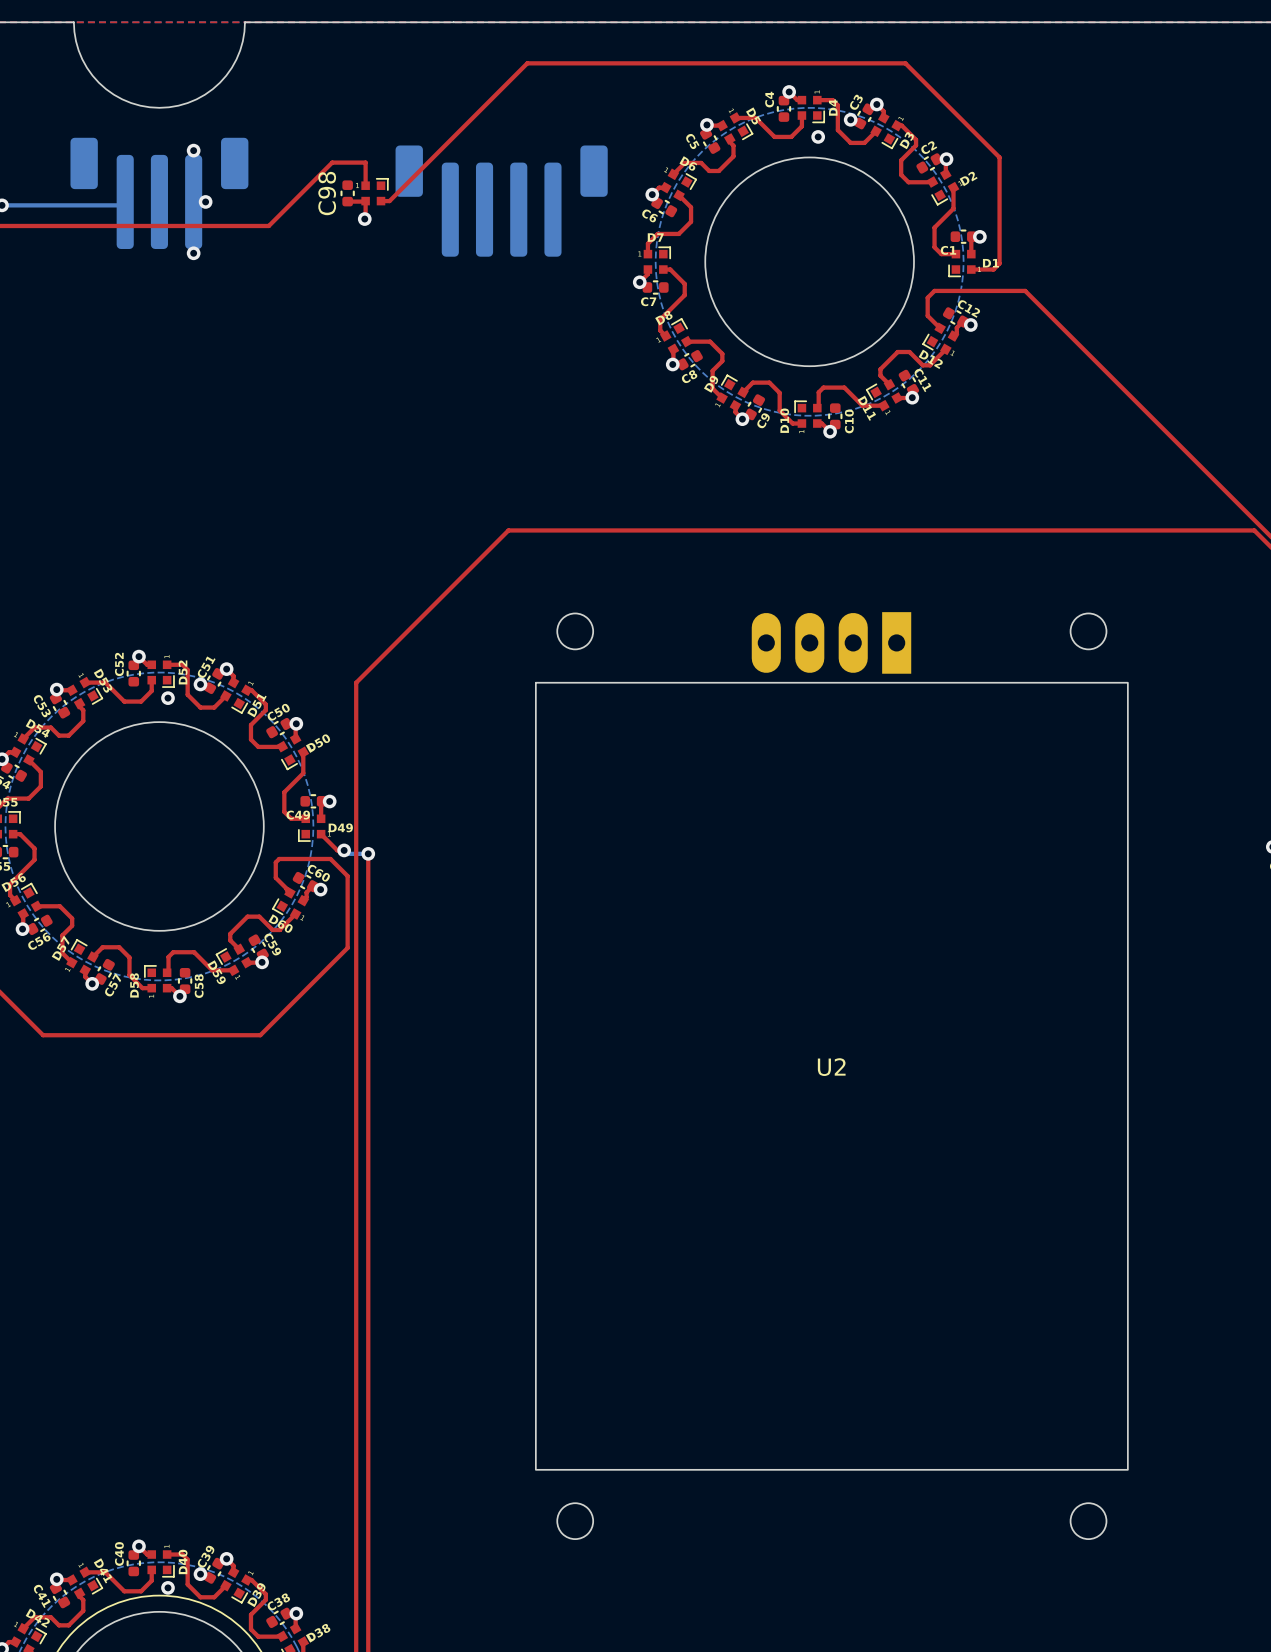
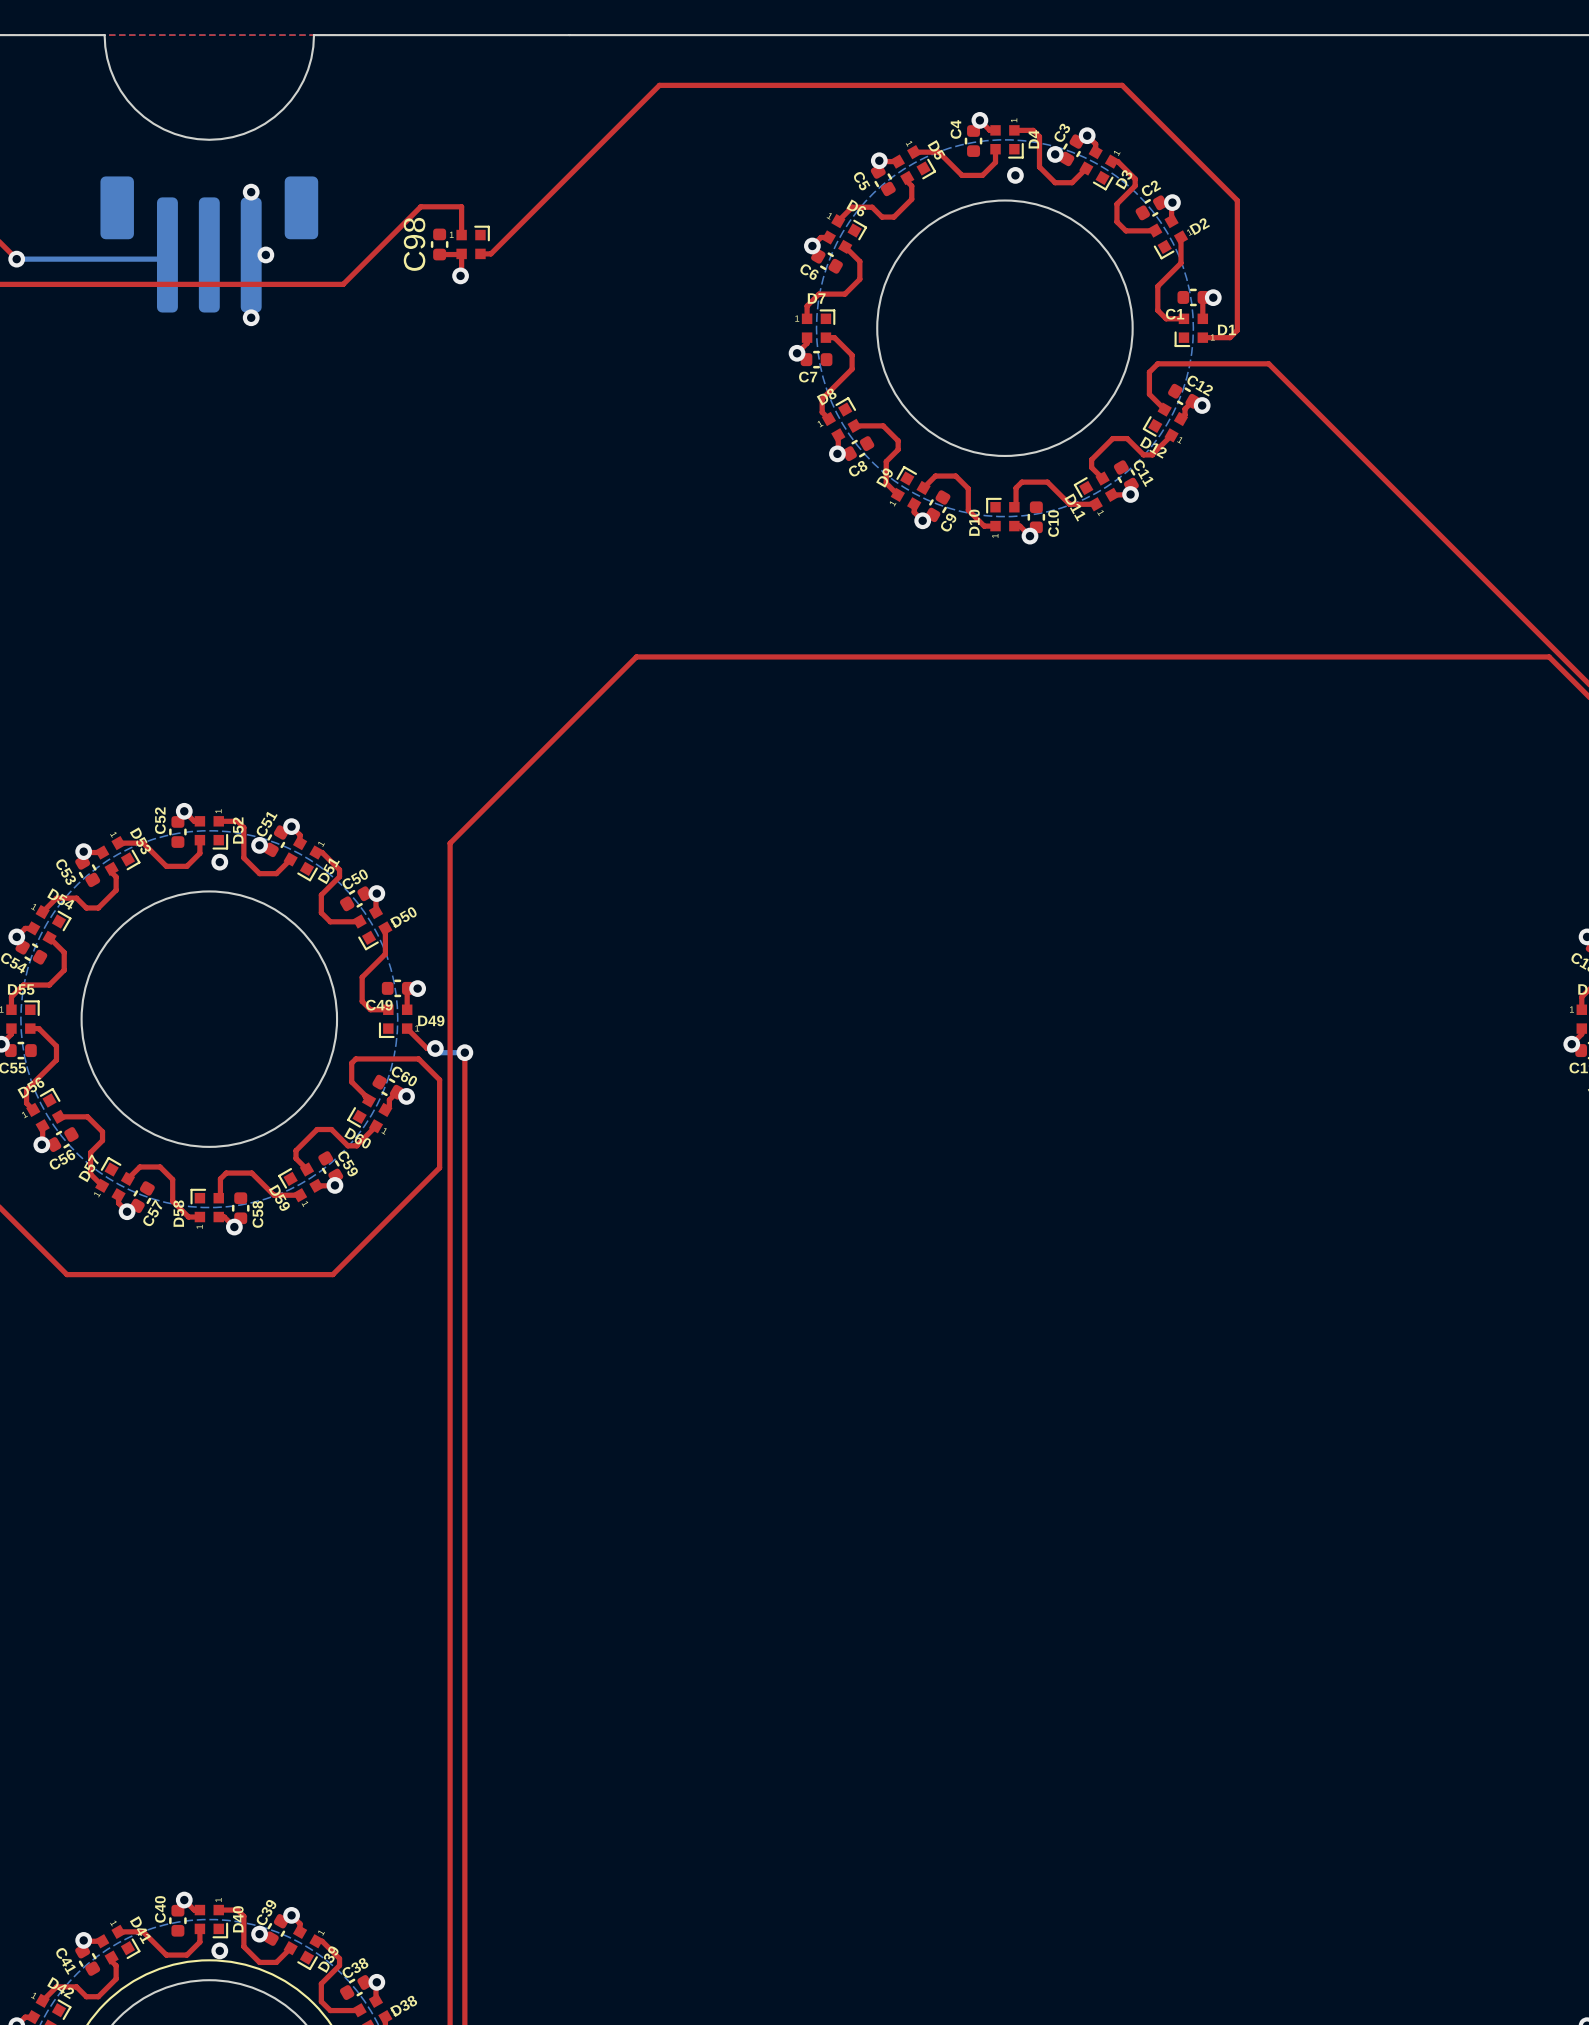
part: (501, 201) -> none
U2: (831, 1075) -> none

